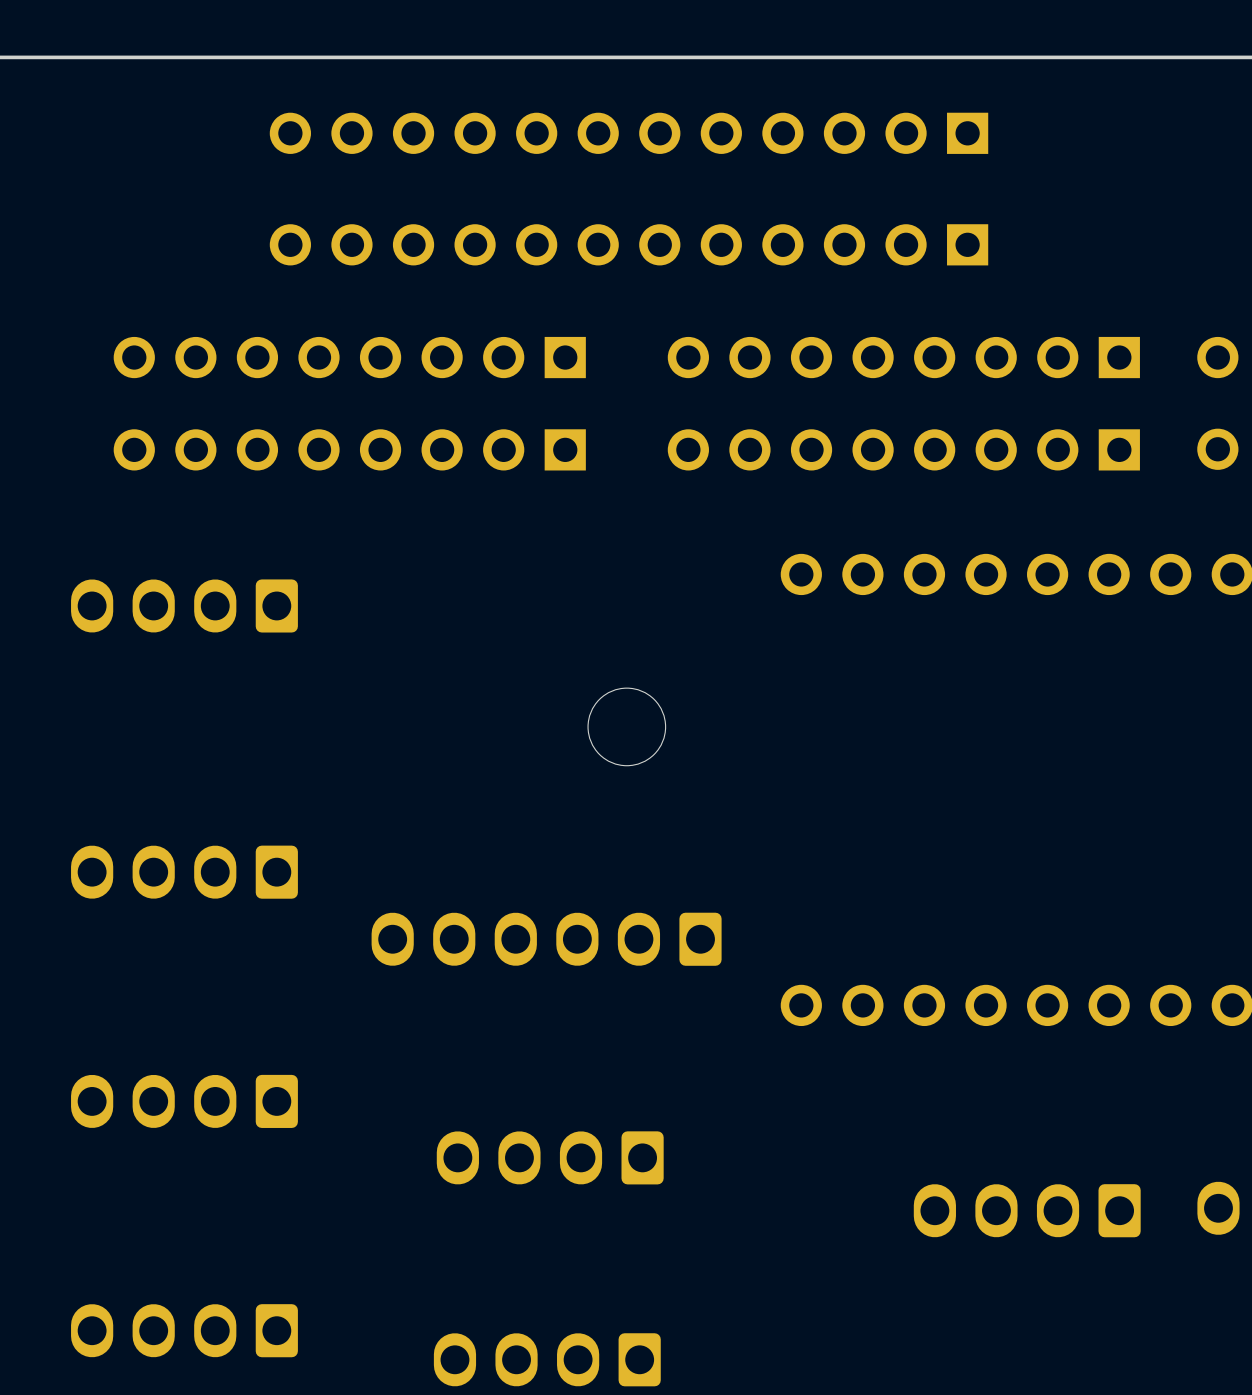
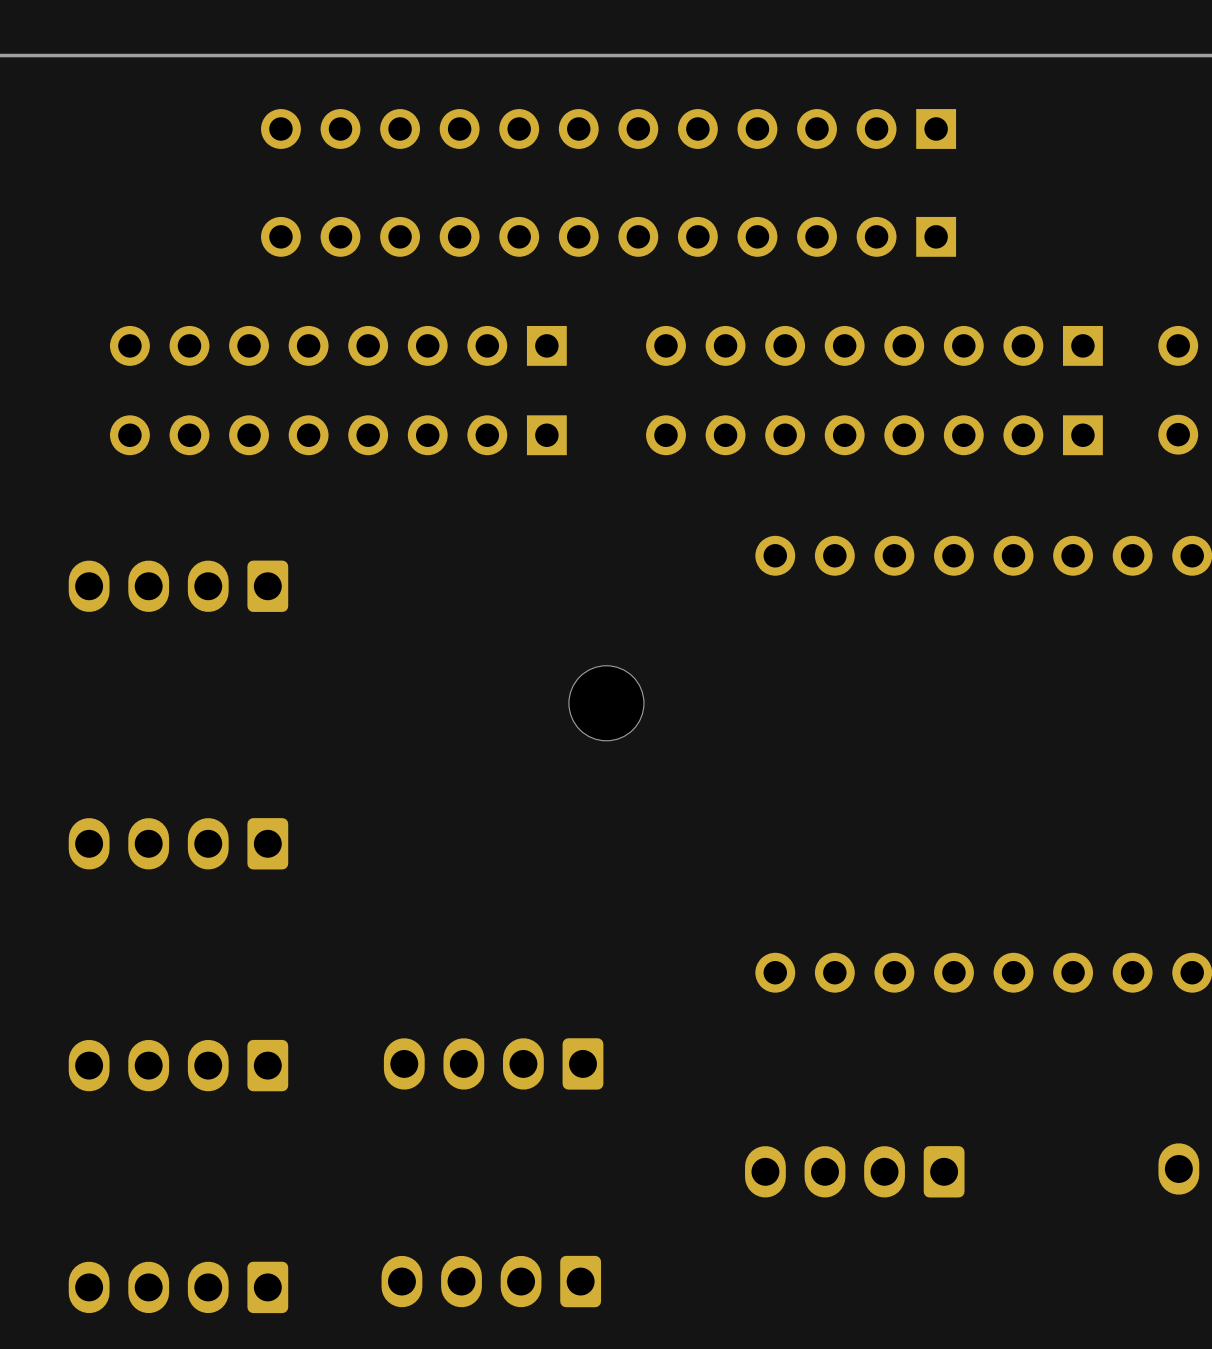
part: (546, 939) -> none
part position: (550, 1157) -> (493, 1063)
part position: (1027, 1210) -> (854, 1171)
part position: (547, 1359) -> (491, 1281)

